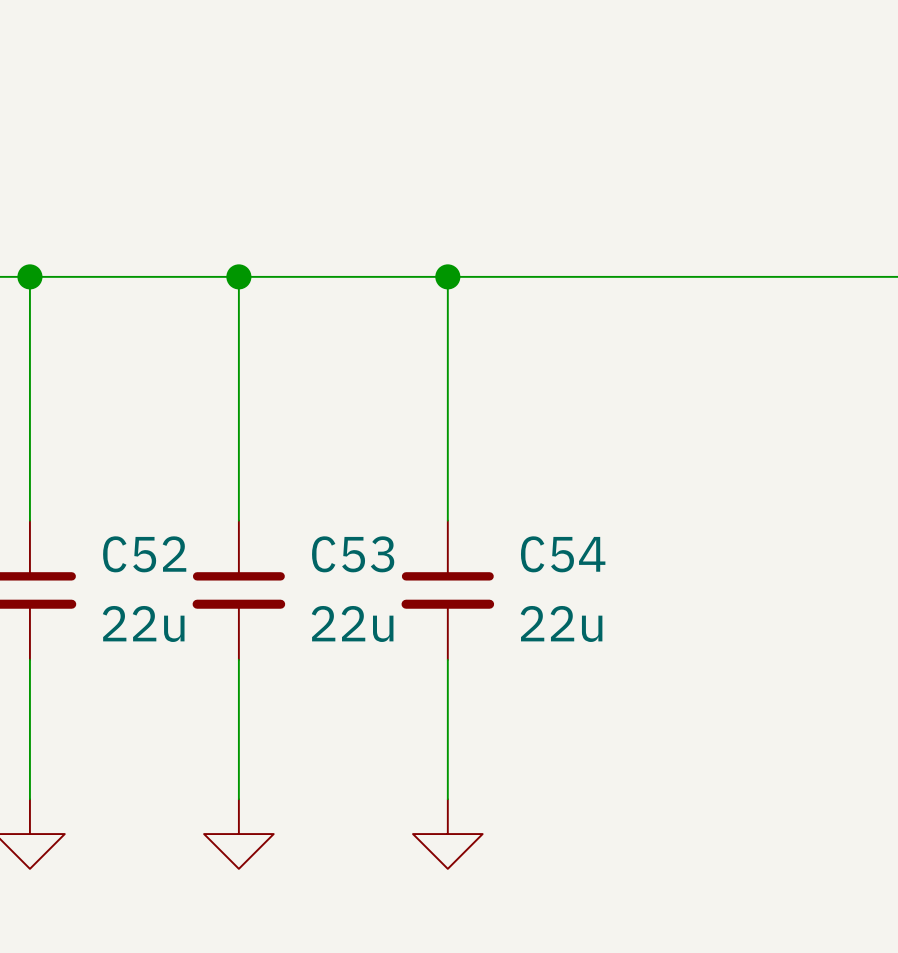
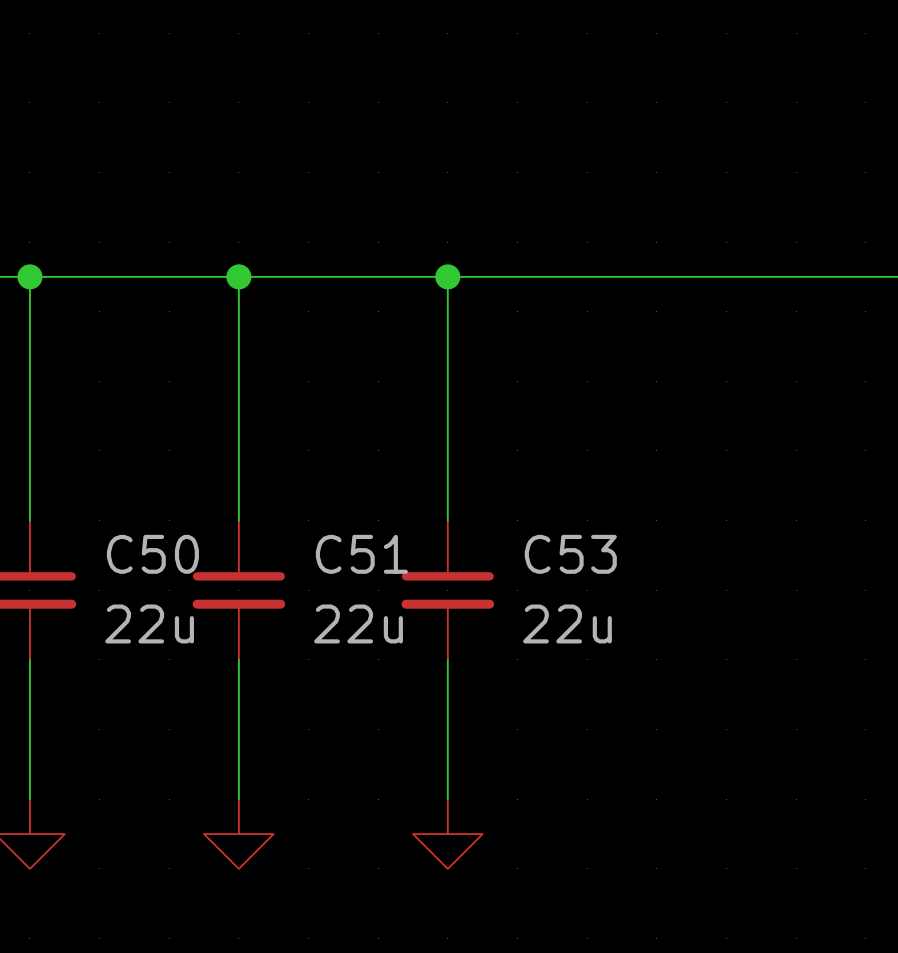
C52 name: C52 (144, 554) -> C50 (152, 554)
C53 name: C53 (353, 554) -> C51 (361, 554)
C54 name: C54 (563, 554) -> C53 (570, 554)

